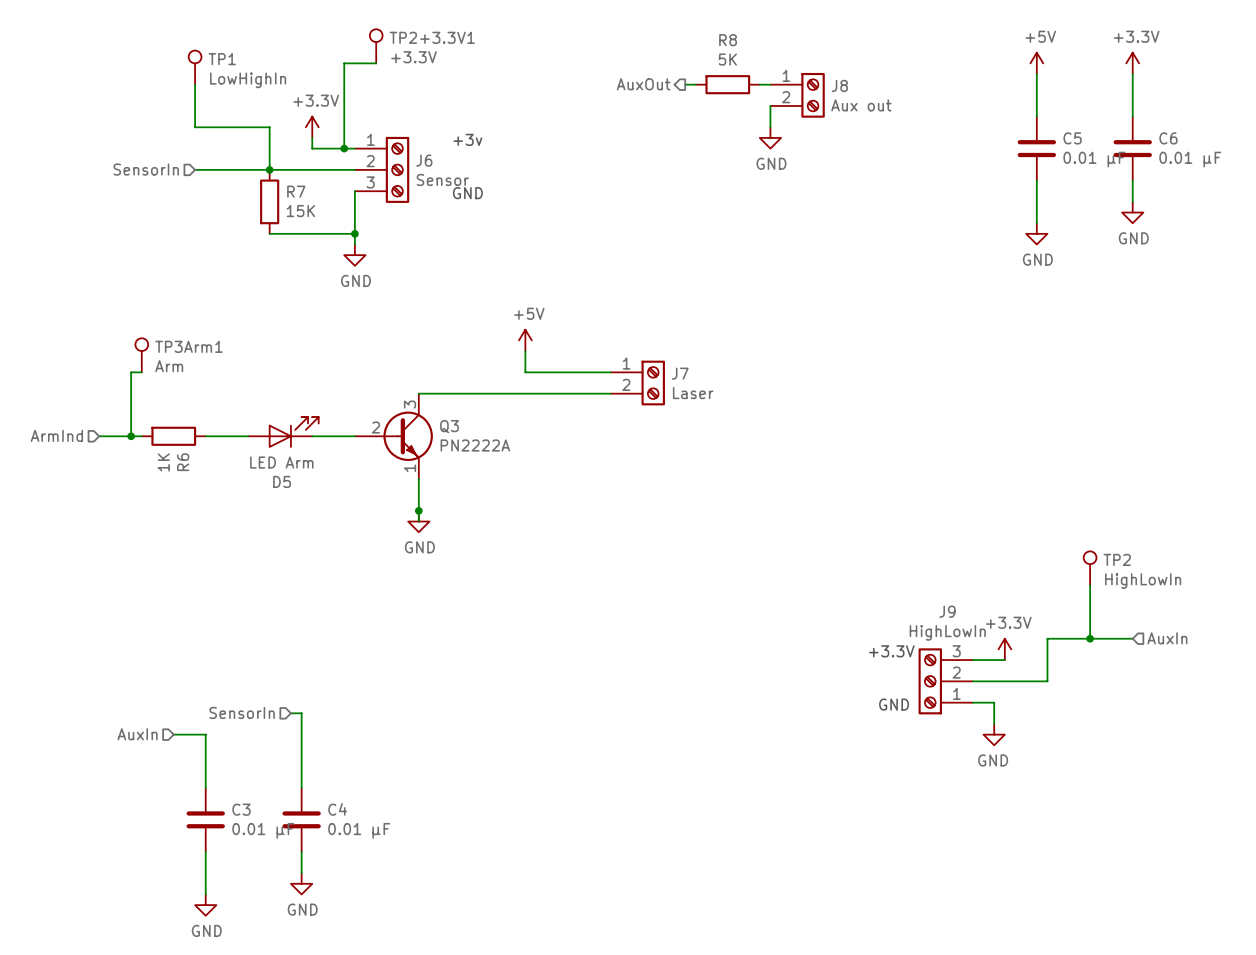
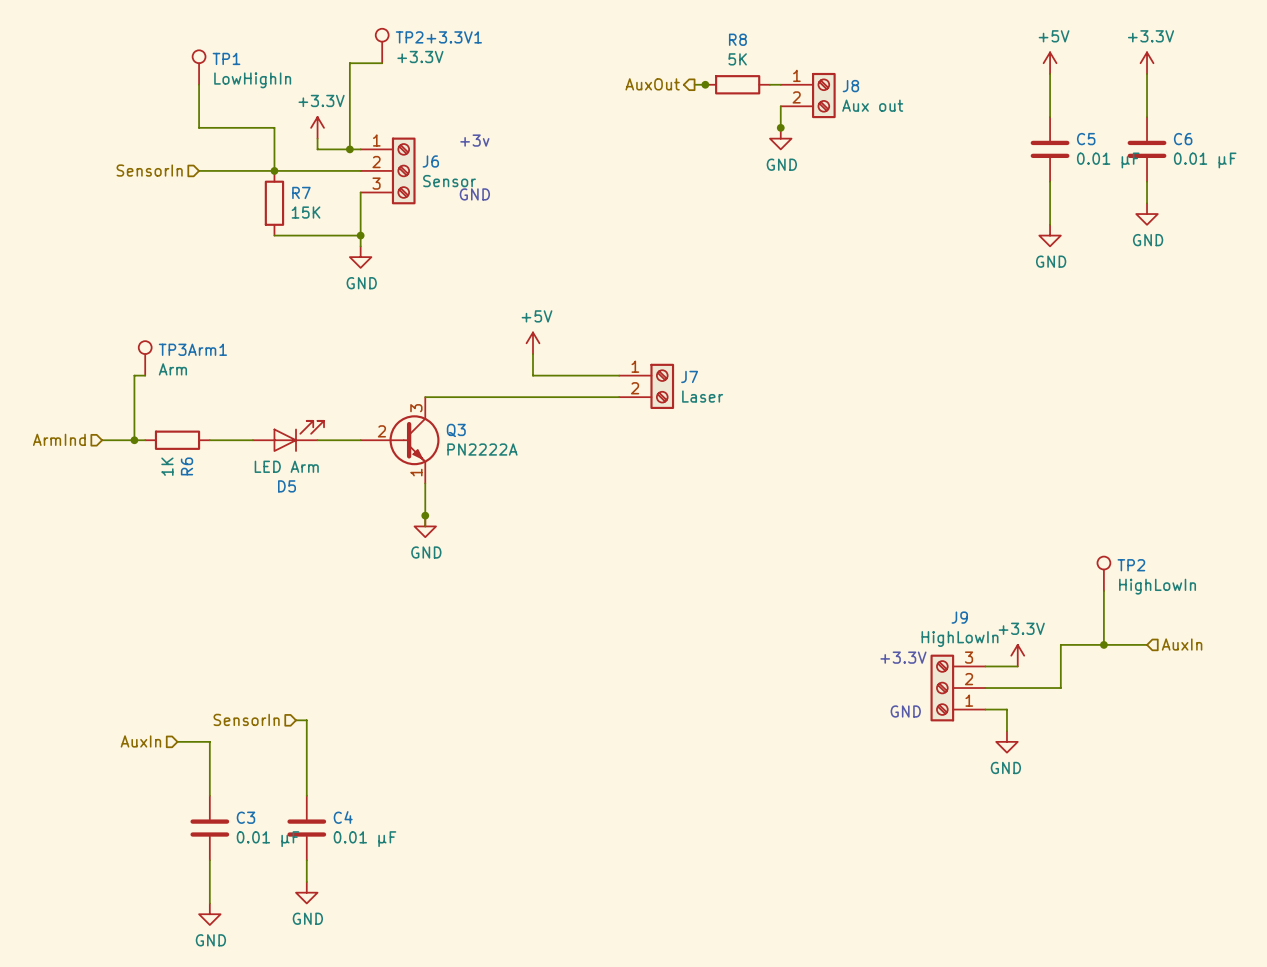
junction: none -> (705, 84)
junction: none -> (780, 127)

